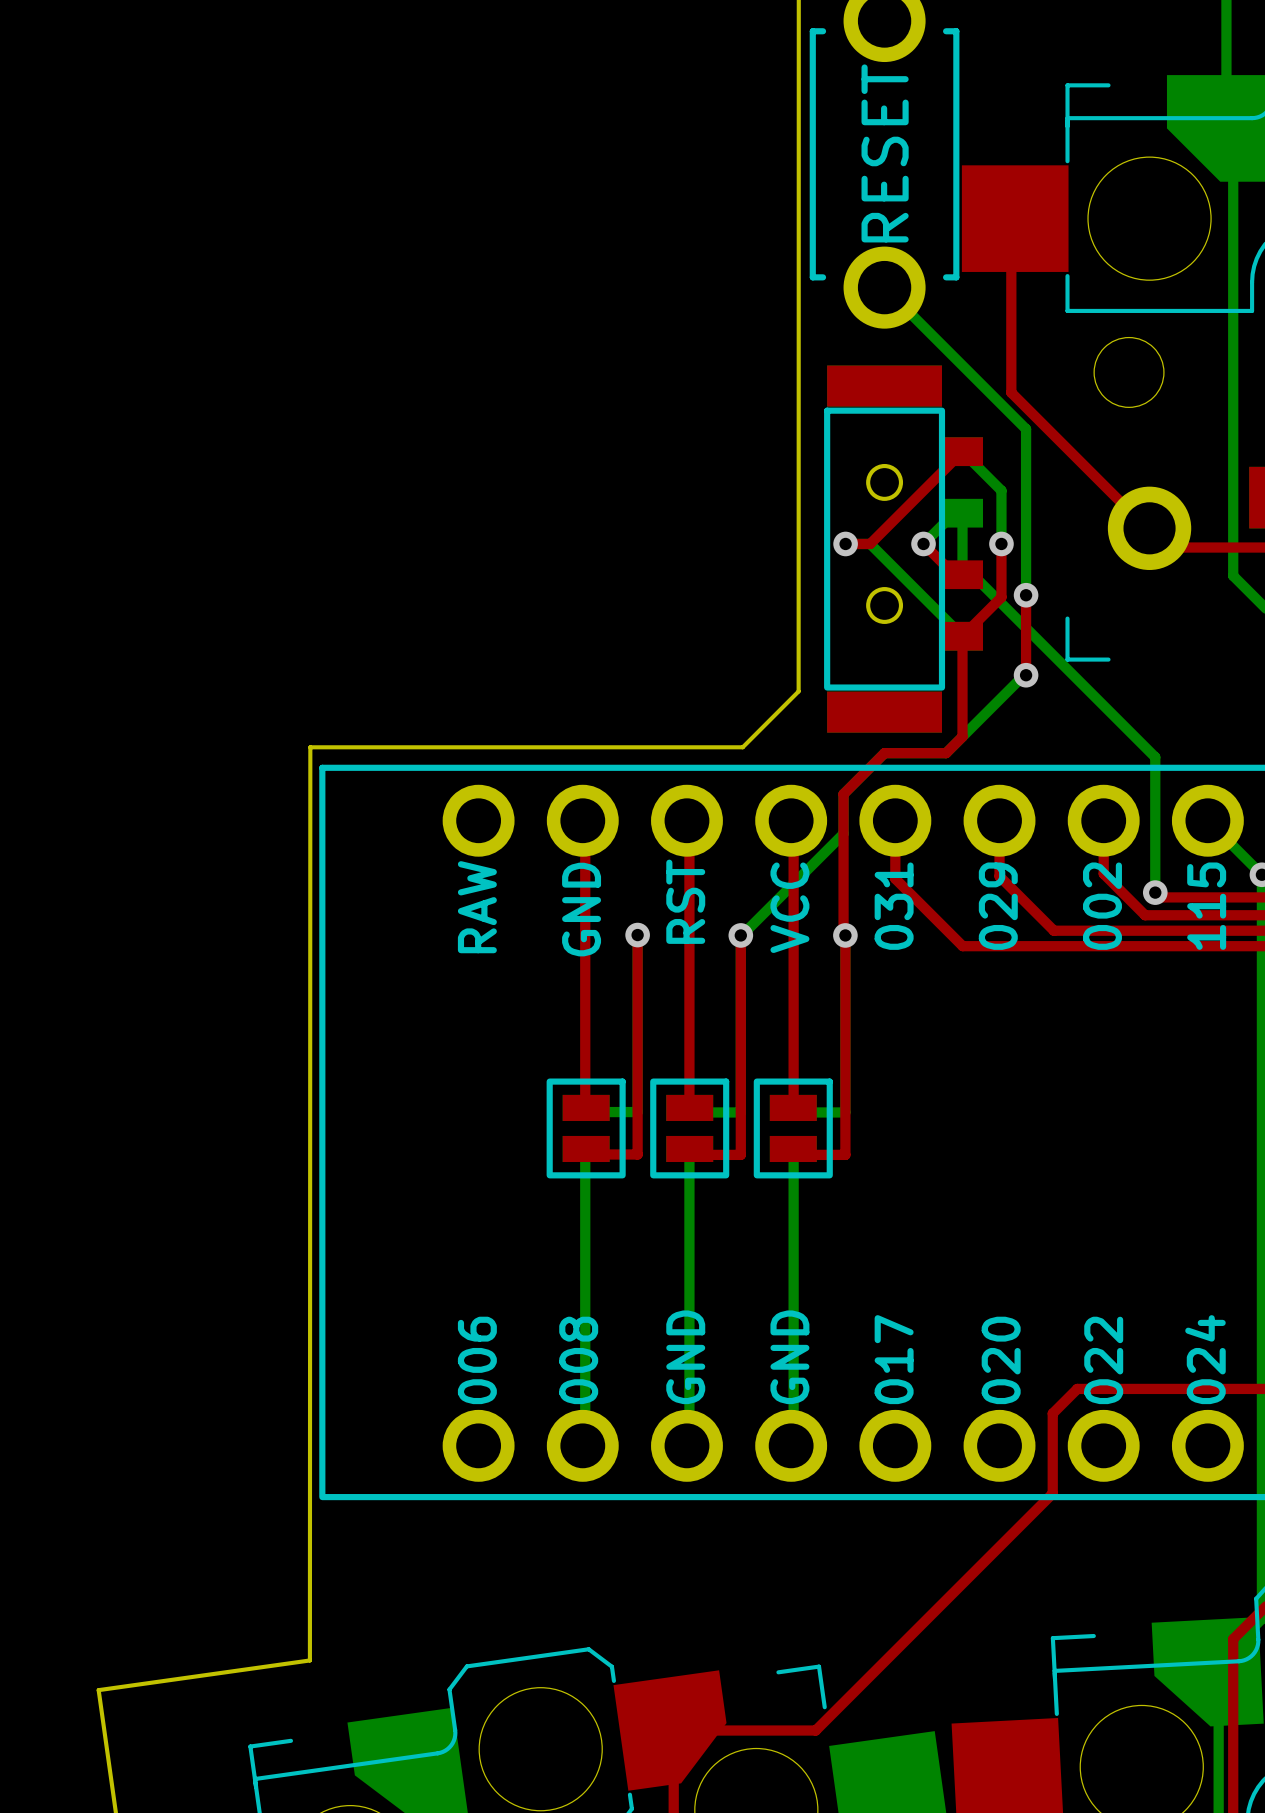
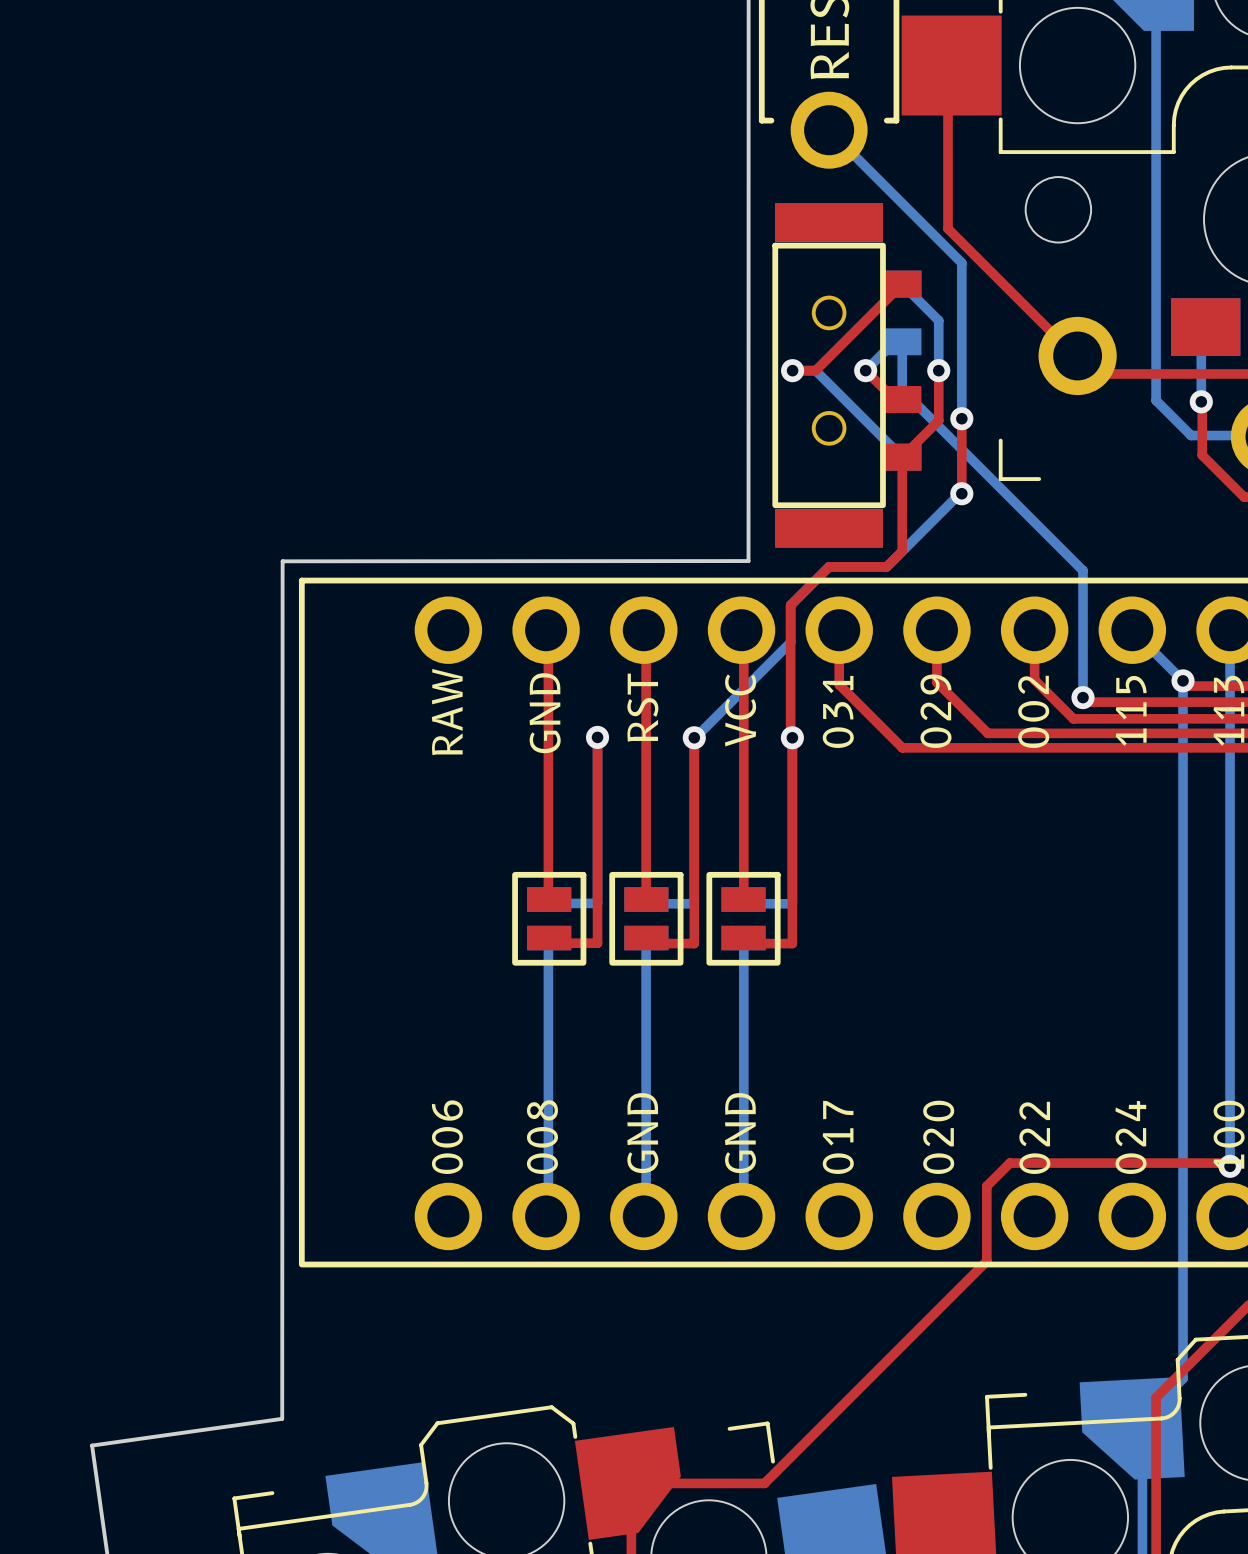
board edge: (798, 691) (742, 747) (310, 747) (309, 1660) (301, 1661) -> (748, 508) (748, 561) (282, 561) (282, 1418)

